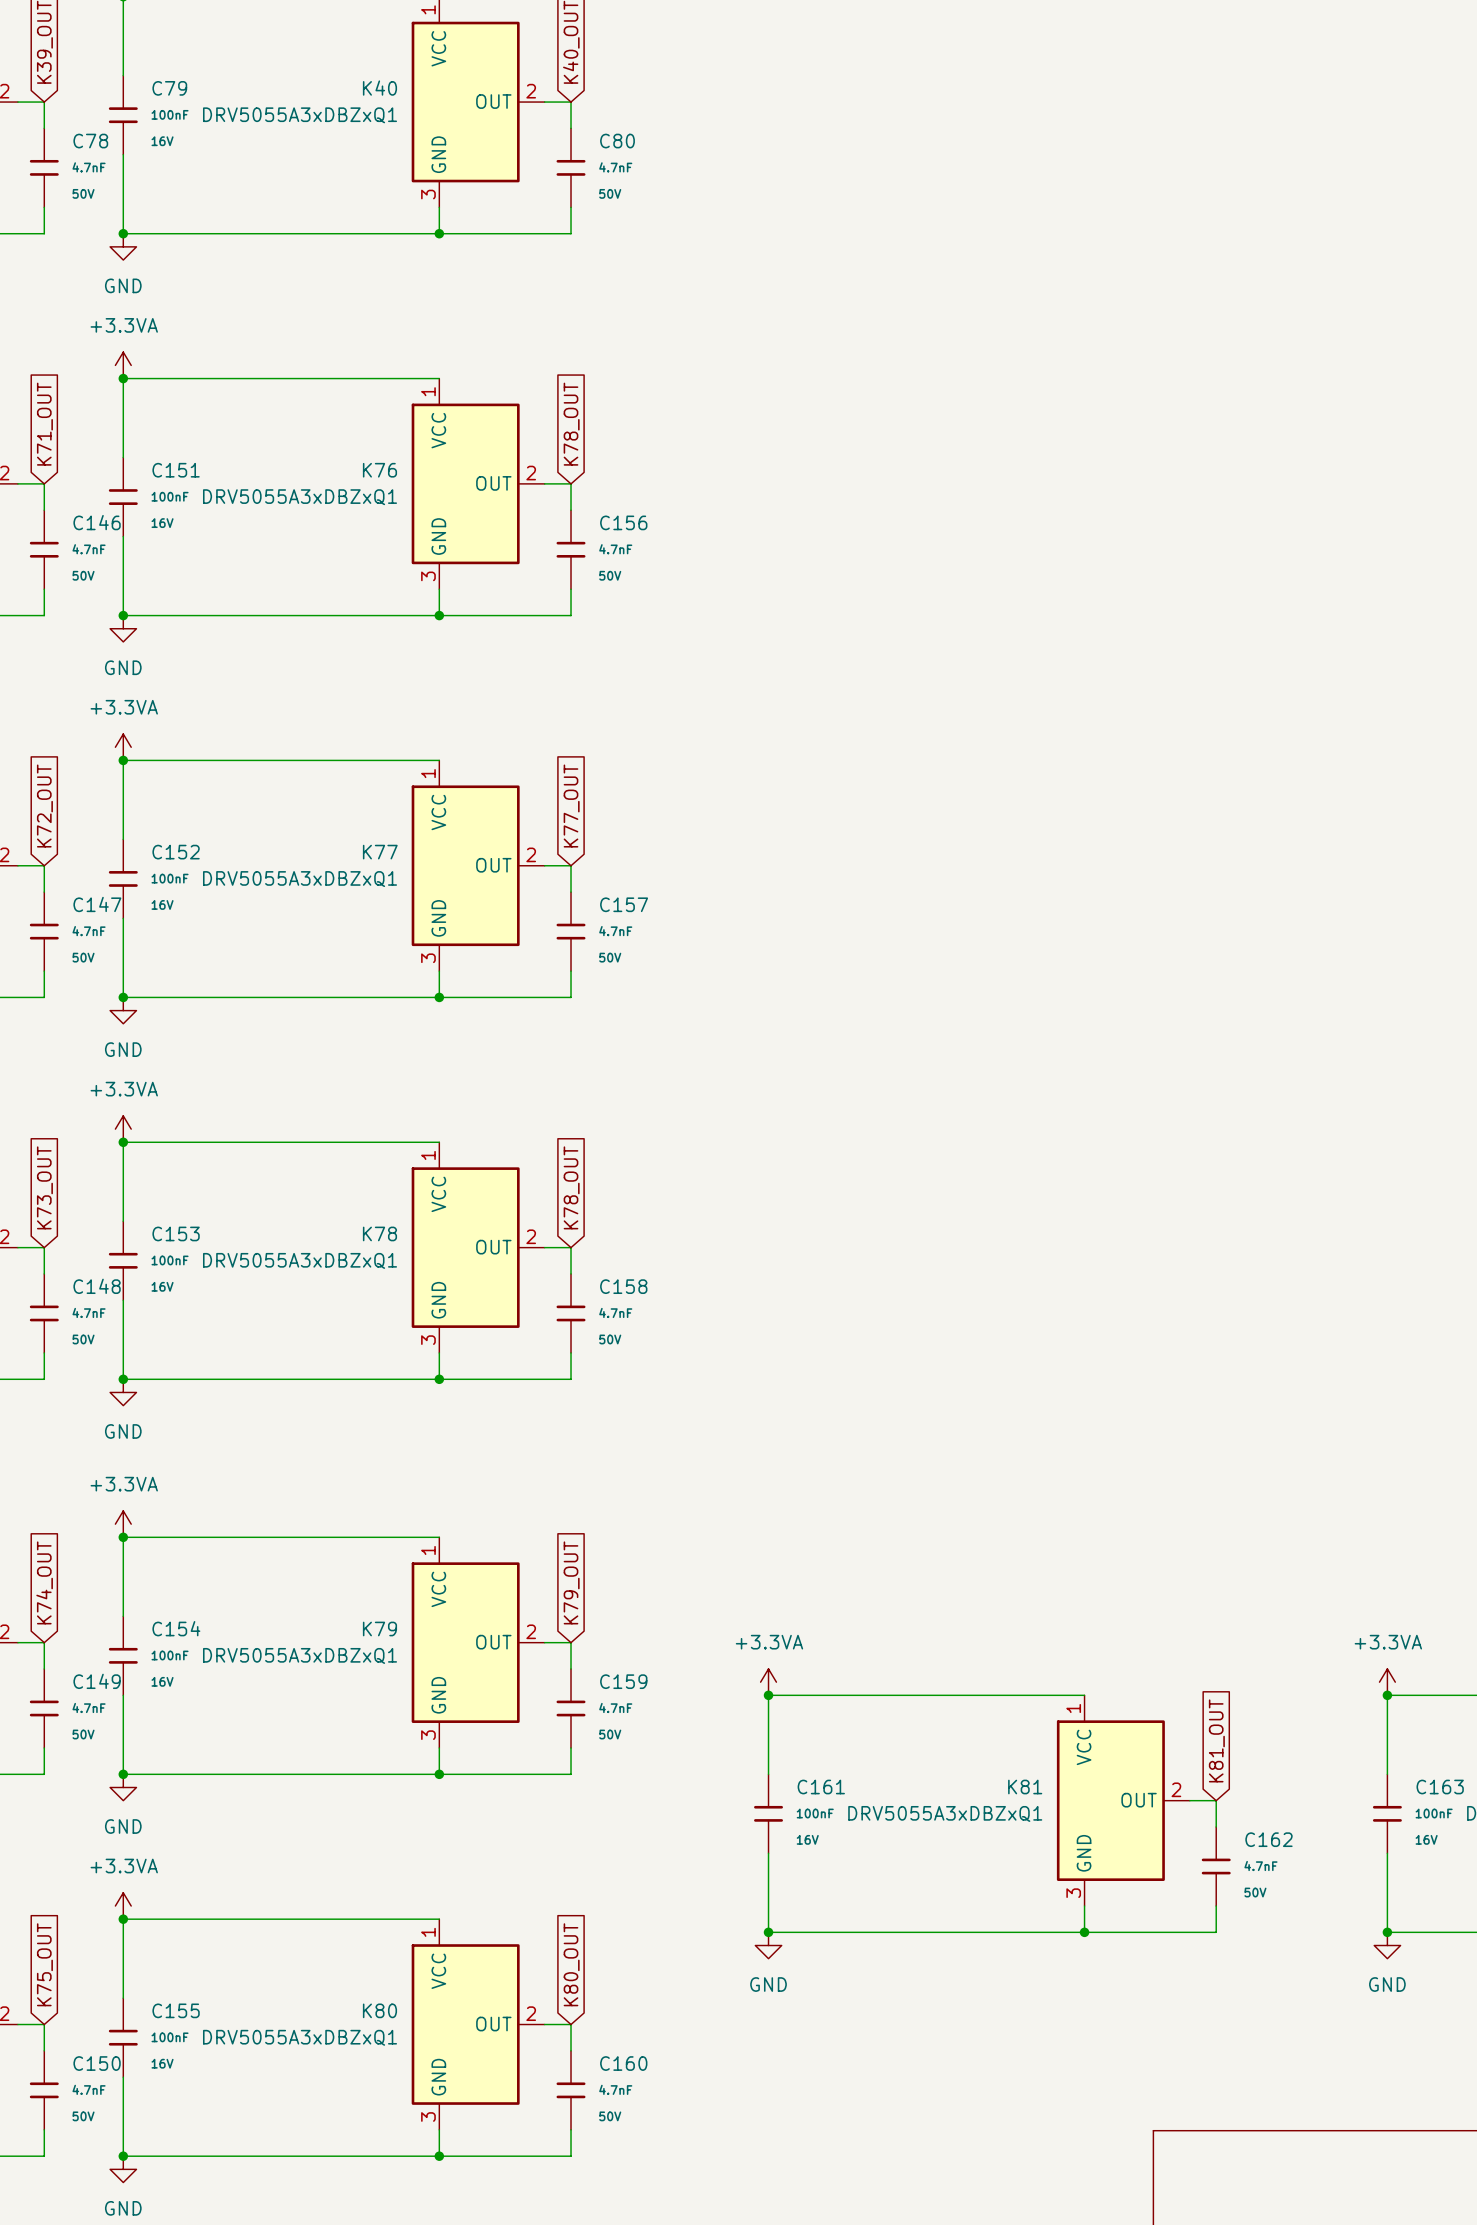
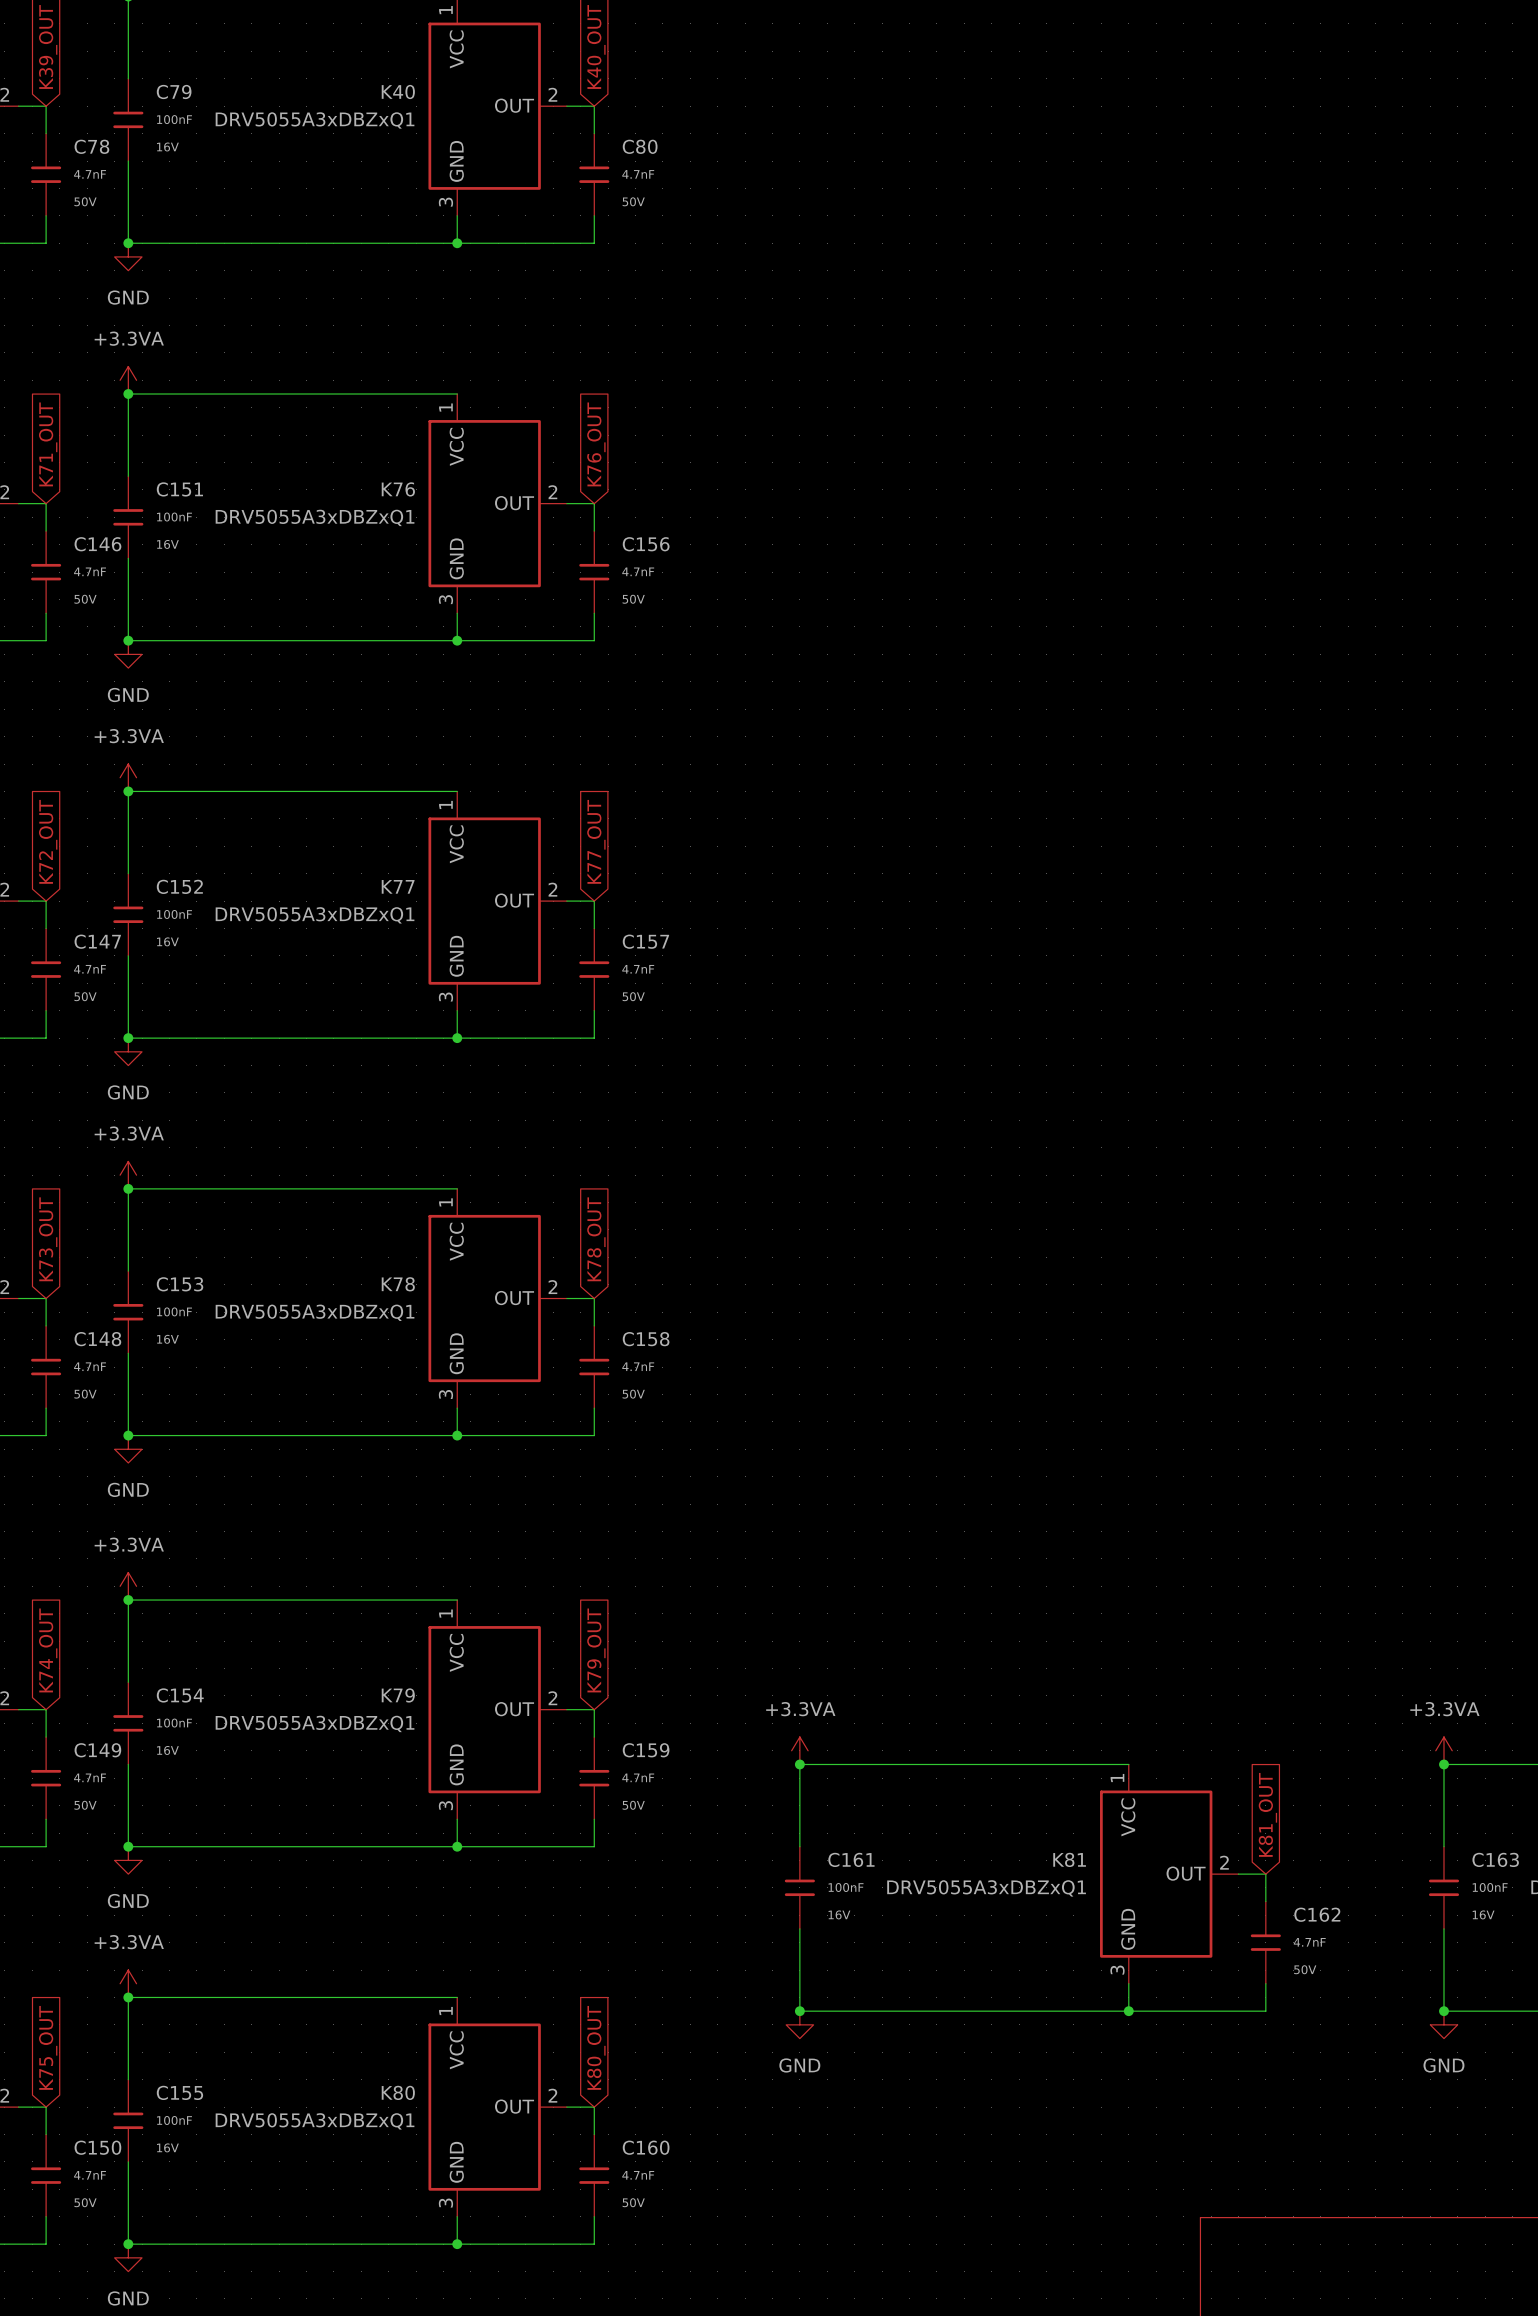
global label: K78_OUT (571, 424) -> K76_OUT (596, 444)

